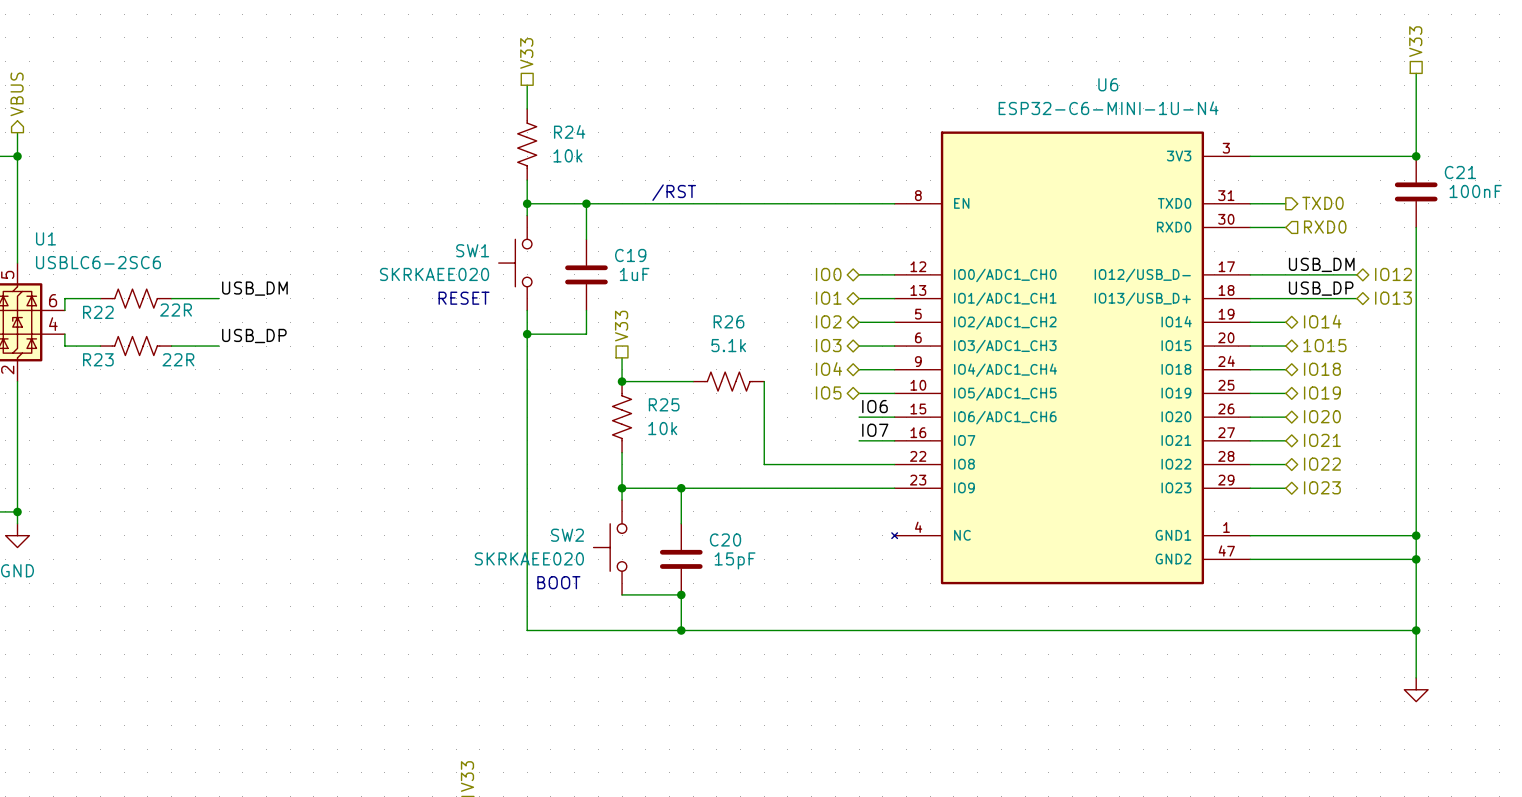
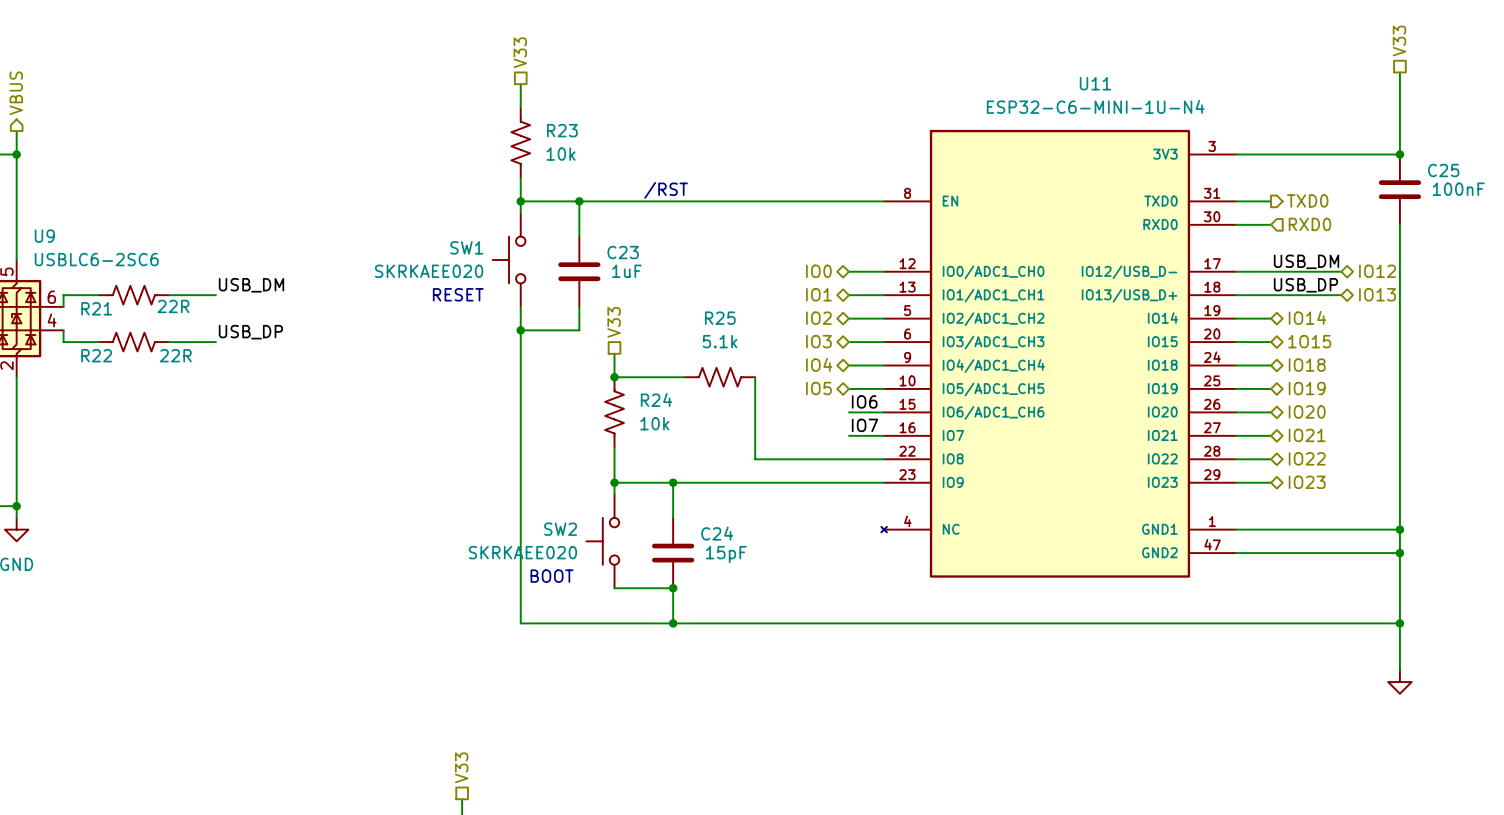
U6 name: U6 (1108, 84) -> U11 (1095, 83)
R24 name: R24 (569, 131) -> R23 (562, 130)
C21 name: C21 (1460, 172) -> C25 (1443, 170)
U1 name: U1 (45, 238) -> U9 (44, 236)
C19 name: C19 (630, 255) -> C23 (623, 252)
R22 name: R22 (98, 312) -> R21 (96, 308)
R26 name: R26 (728, 321) -> R25 (720, 318)
R23 name: R23 (98, 359) -> R22 (96, 355)
R25 name: R25 (664, 404) -> R24 (656, 399)
C20 name: C20 (725, 539) -> C24 (717, 533)

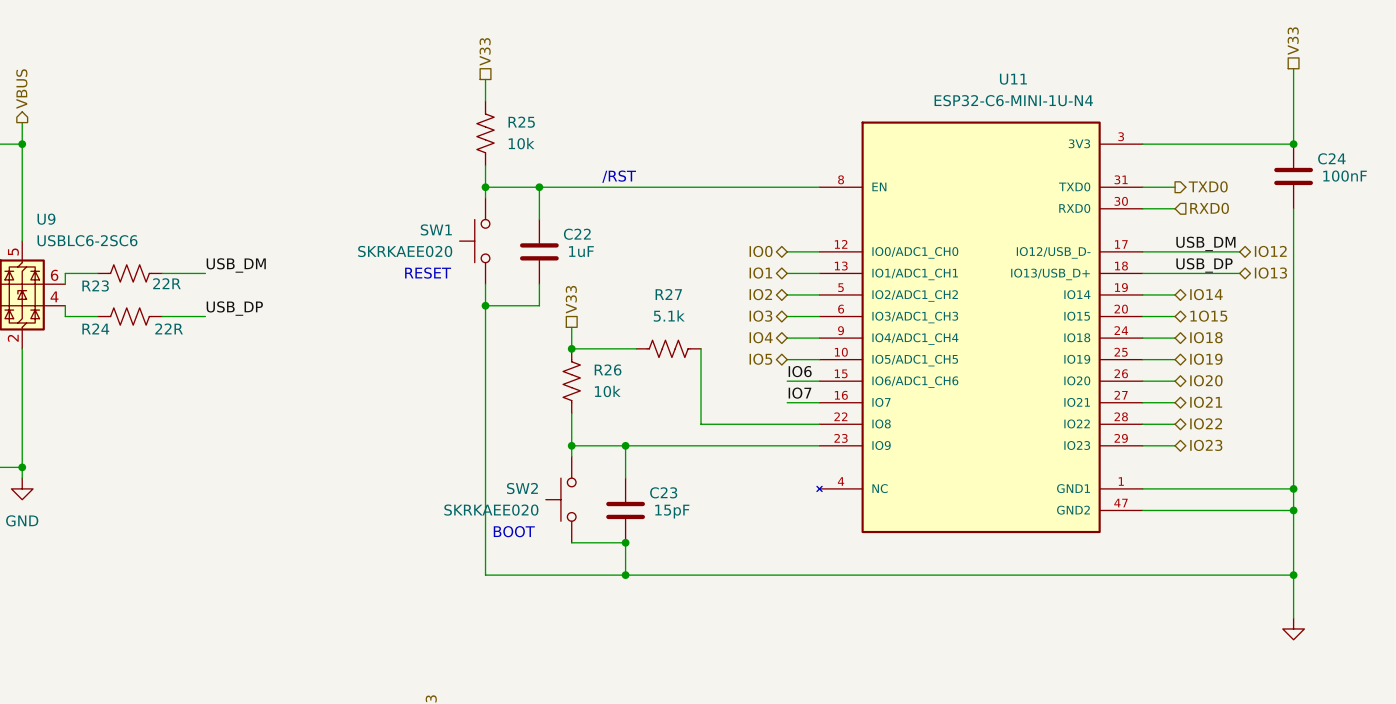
R23 name: R23 (562, 130) -> R25 (521, 122)
C25 name: C25 (1443, 170) -> C24 (1331, 158)
C23 name: C23 (623, 252) -> C22 (577, 234)
R21 name: R21 (96, 308) -> R23 (95, 285)
R25 name: R25 (720, 318) -> R27 (668, 294)
R22 name: R22 (96, 355) -> R24 (95, 328)
R24 name: R24 (656, 399) -> R26 (608, 370)
C24 name: C24 (717, 533) -> C23 (663, 492)

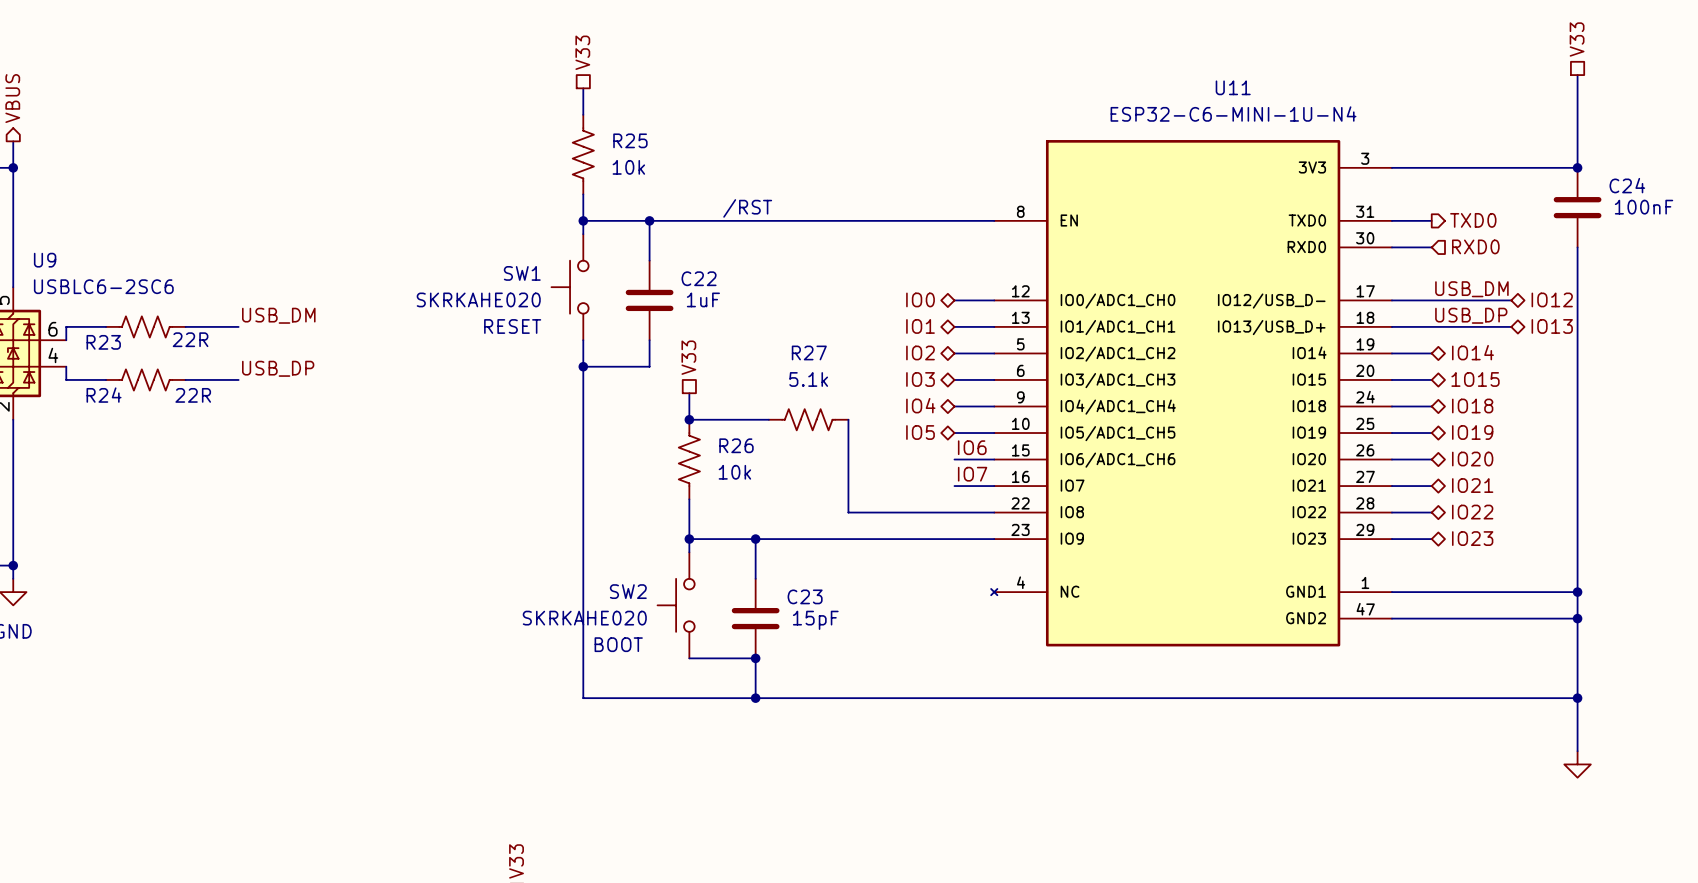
SW1 value: SKRKAEE020 (405, 251) -> SKRKAHE020 (478, 299)
SW2 value: SKRKAEE020 (491, 510) -> SKRKAHE020 (584, 618)

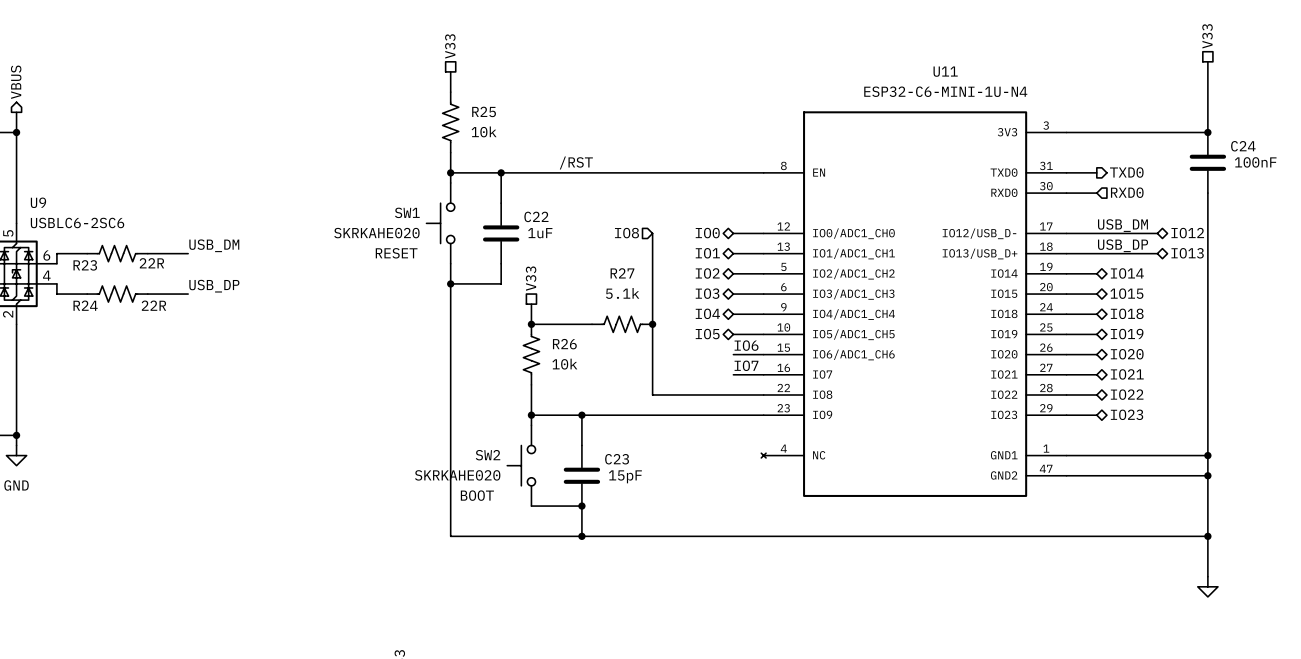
hierarchical label: none -> IO8 (626, 233)
wire: none -> (652, 233) (652, 324)
junction: none -> (652, 324)

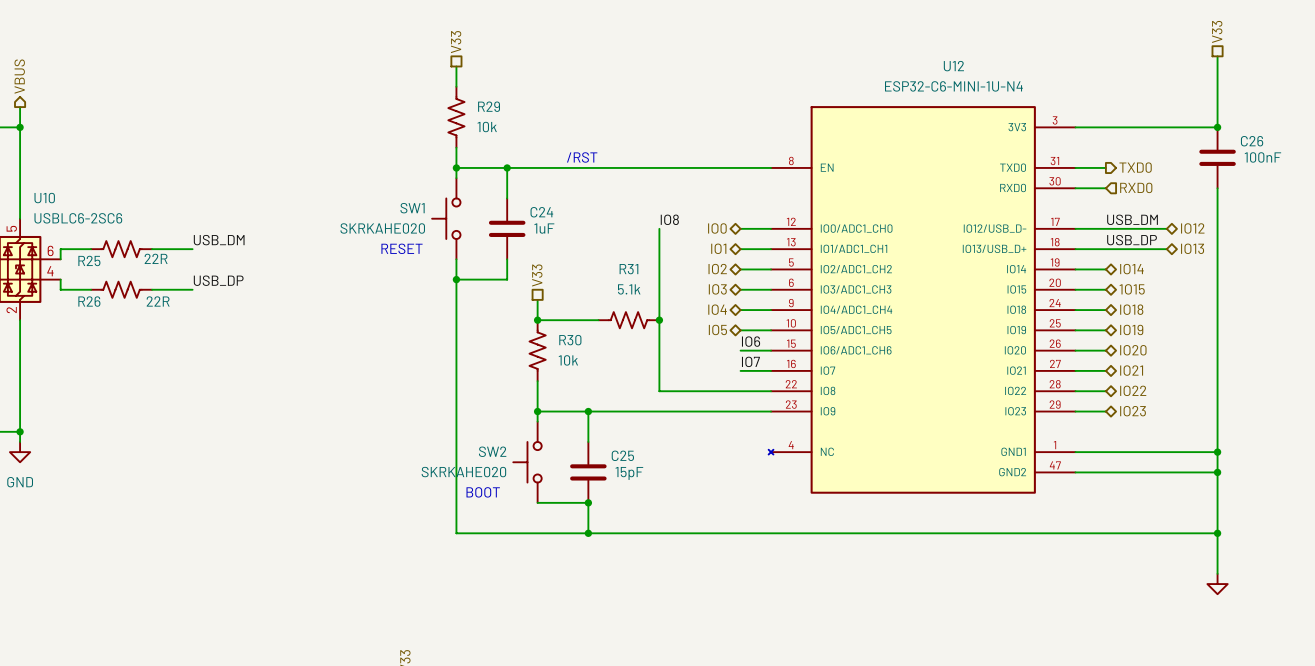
U11 name: U11 (945, 71) -> U12 (953, 66)
R25 name: R25 (484, 111) -> R29 (489, 106)
C24 name: C24 (1243, 146) -> C26 (1252, 141)
U9 name: U9 (38, 202) -> U10 (44, 198)
C22 name: C22 (536, 216) -> C24 (541, 212)
label: none -> IO8 (669, 219)
hierarchical label: IO8 (626, 233) -> none
R23 name: R23 (85, 265) -> R25 (89, 260)
R27 name: R27 (622, 273) -> R31 (628, 269)
R24 name: R24 (85, 305) -> R26 (89, 301)
R26 name: R26 (564, 344) -> R30 (570, 340)
C23 name: C23 (617, 459) -> C25 (622, 455)

